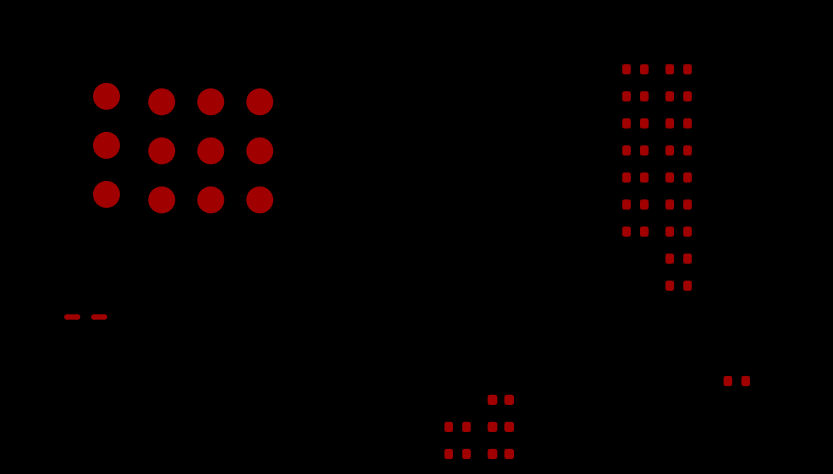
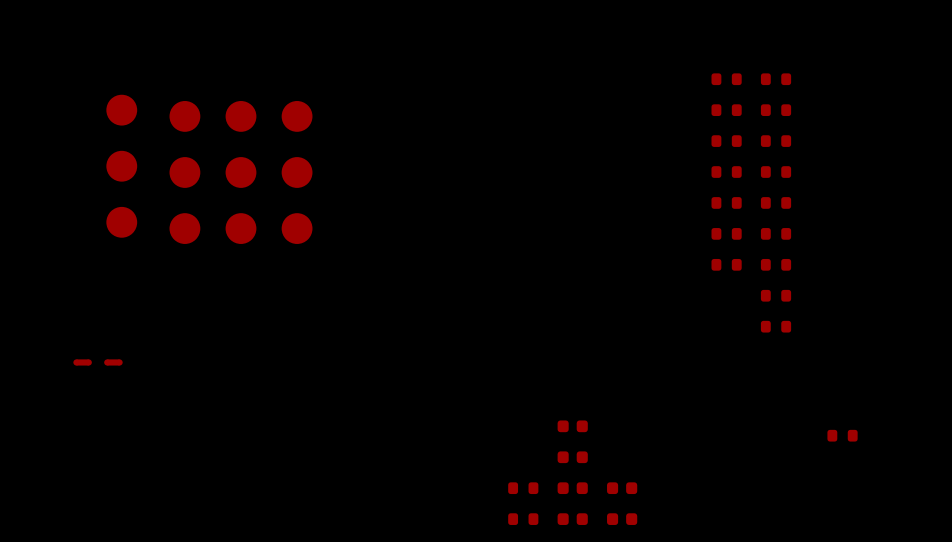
part: none -> (572, 426)
part: none -> (622, 488)
part: none -> (622, 519)

